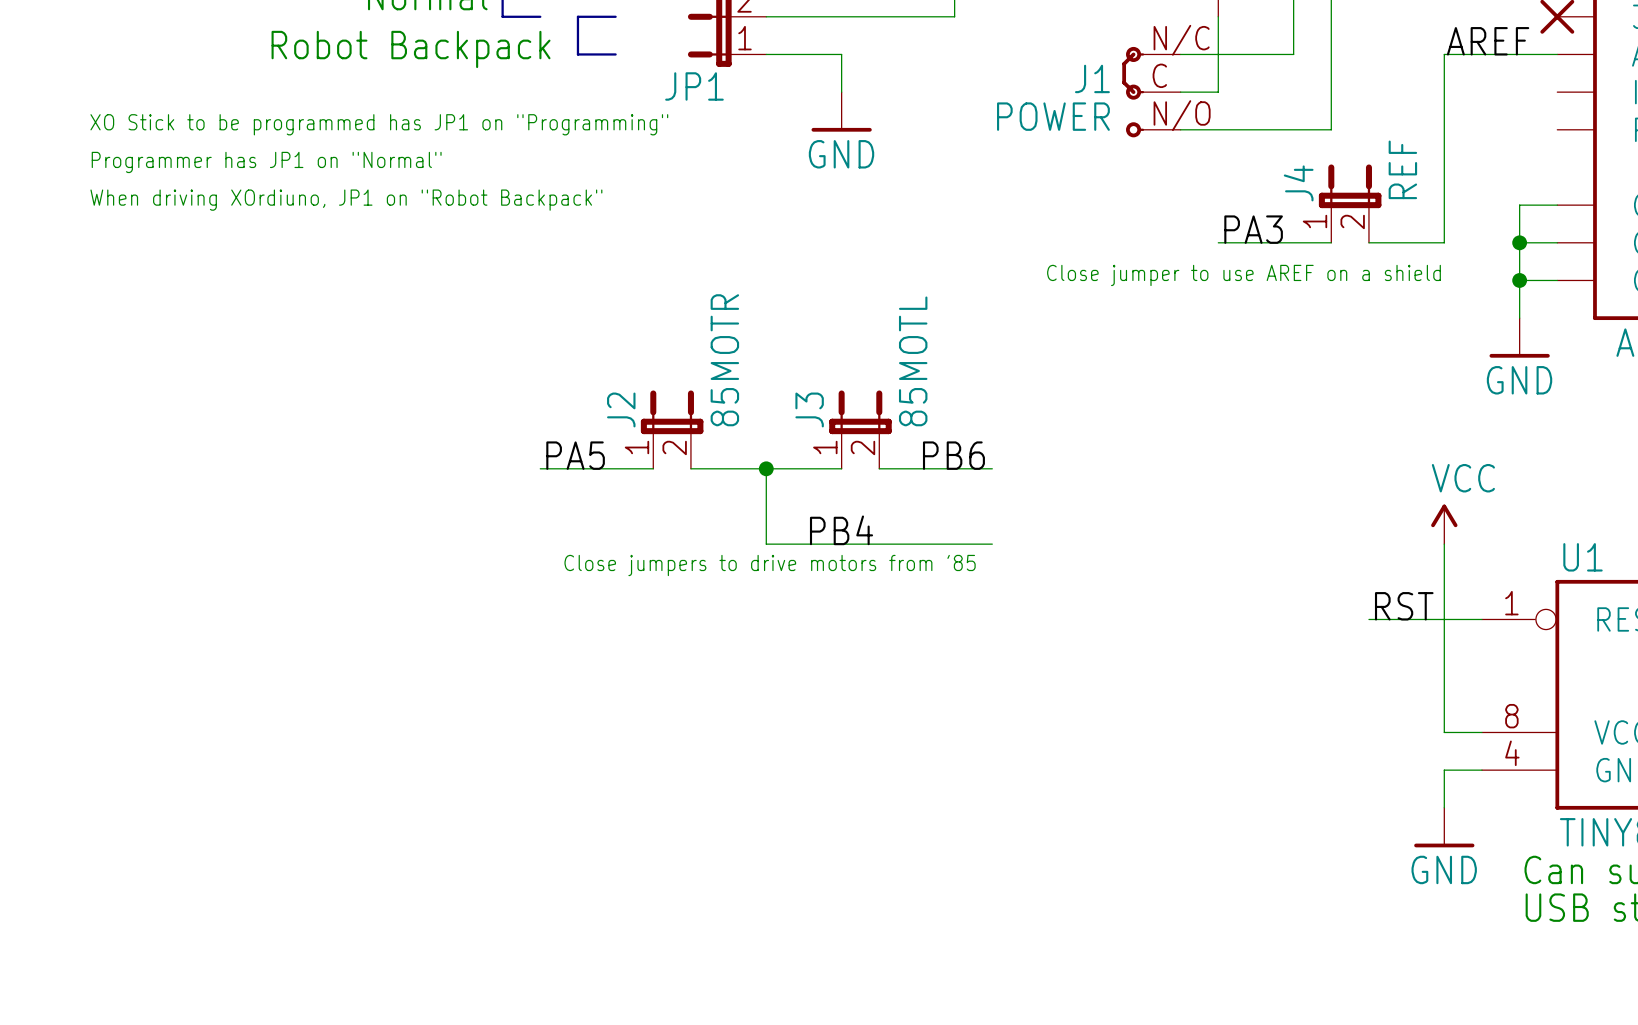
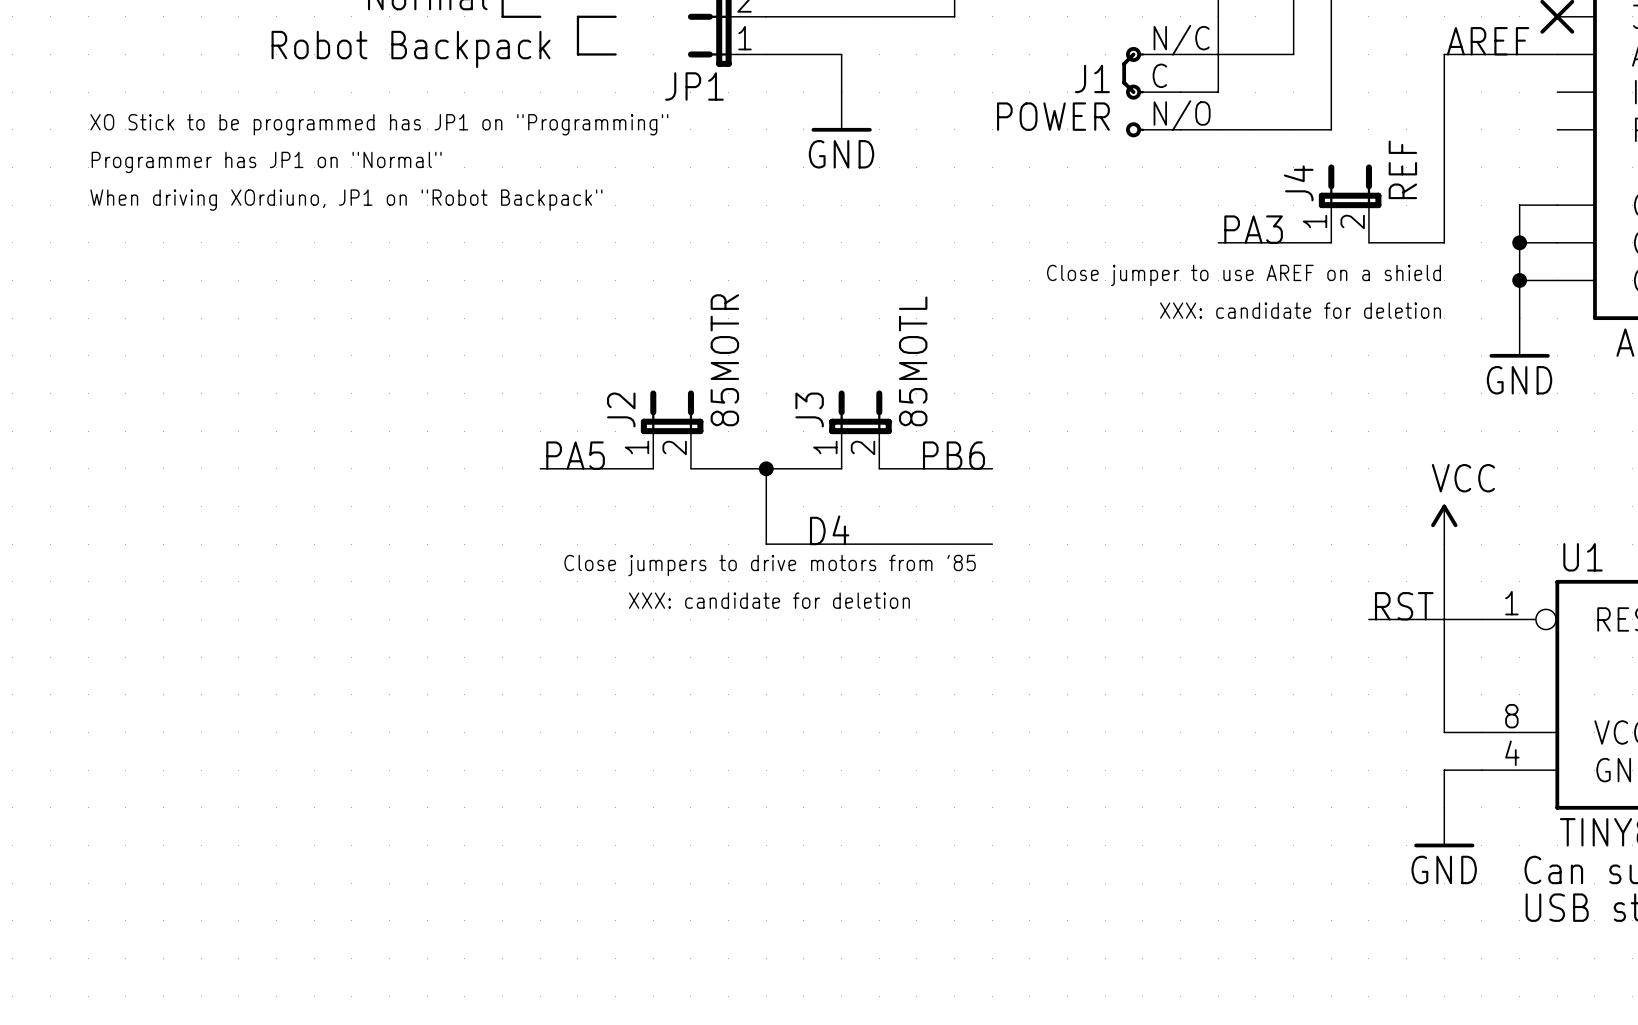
text: none -> XXX: candidate for deletion (1300, 310)
label: PB4 (841, 530) -> D4 (829, 530)
text: none -> XXX: candidate for deletion (769, 600)

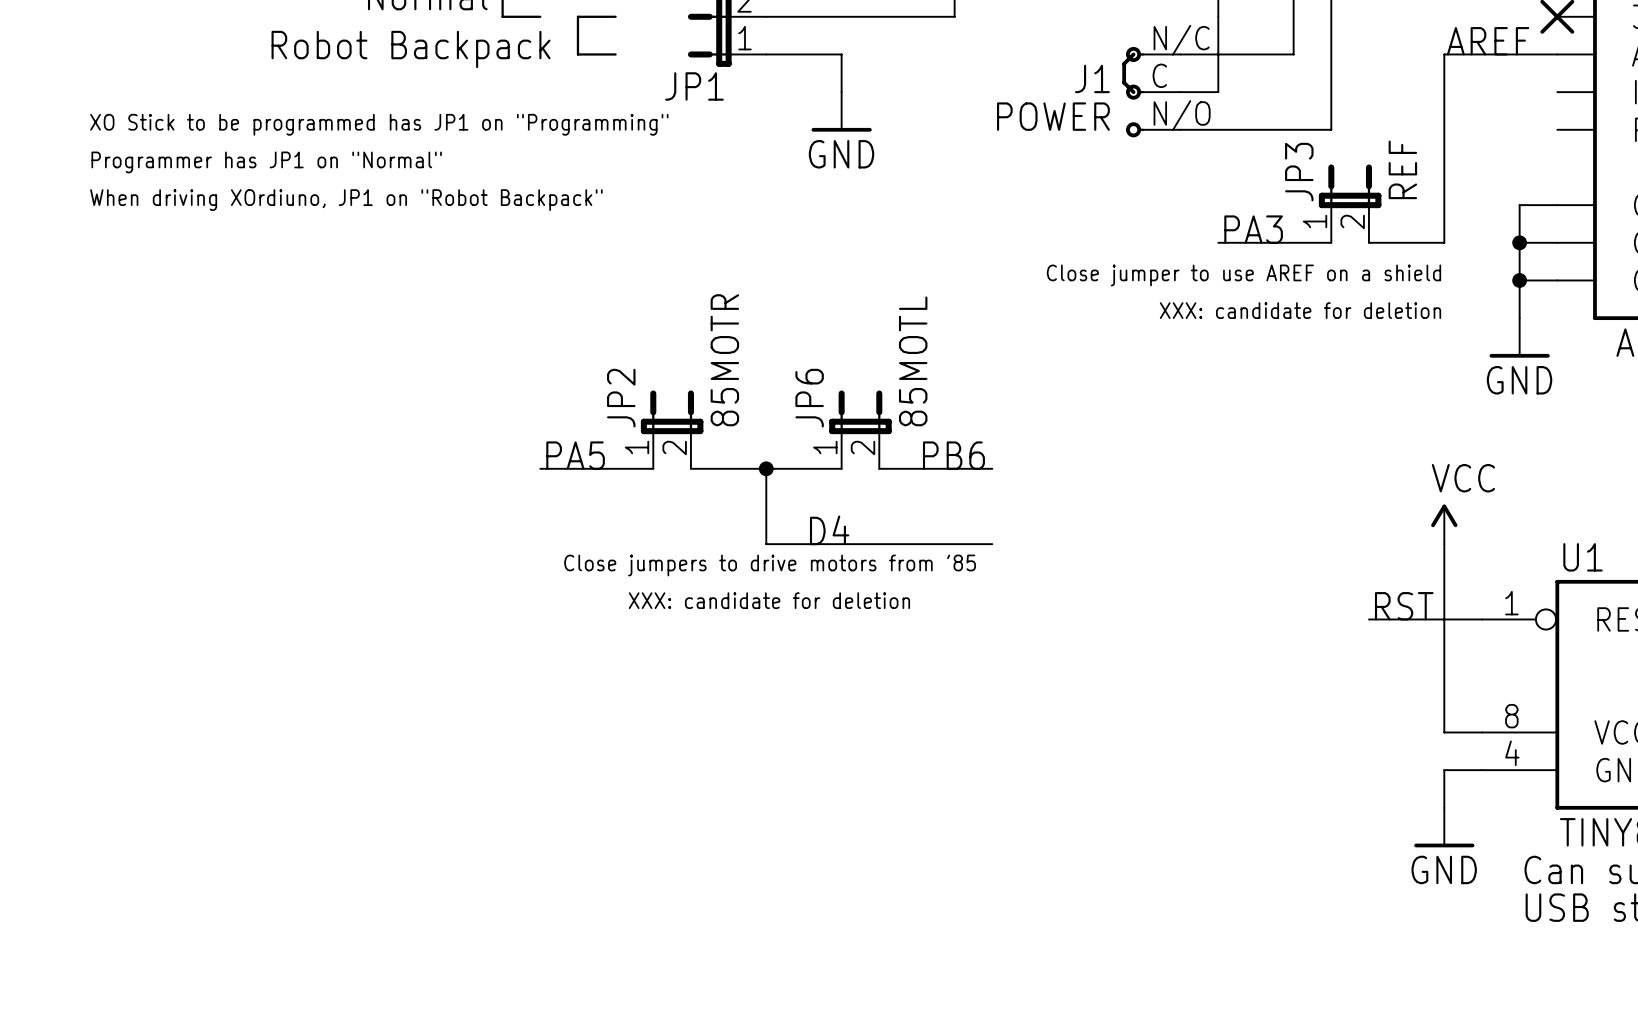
J4 name: J4 (1298, 183) -> JP3 (1299, 172)
J2 name: J2 (621, 409) -> JP2 (621, 398)
J3 name: J3 (809, 409) -> JP6 (809, 398)

